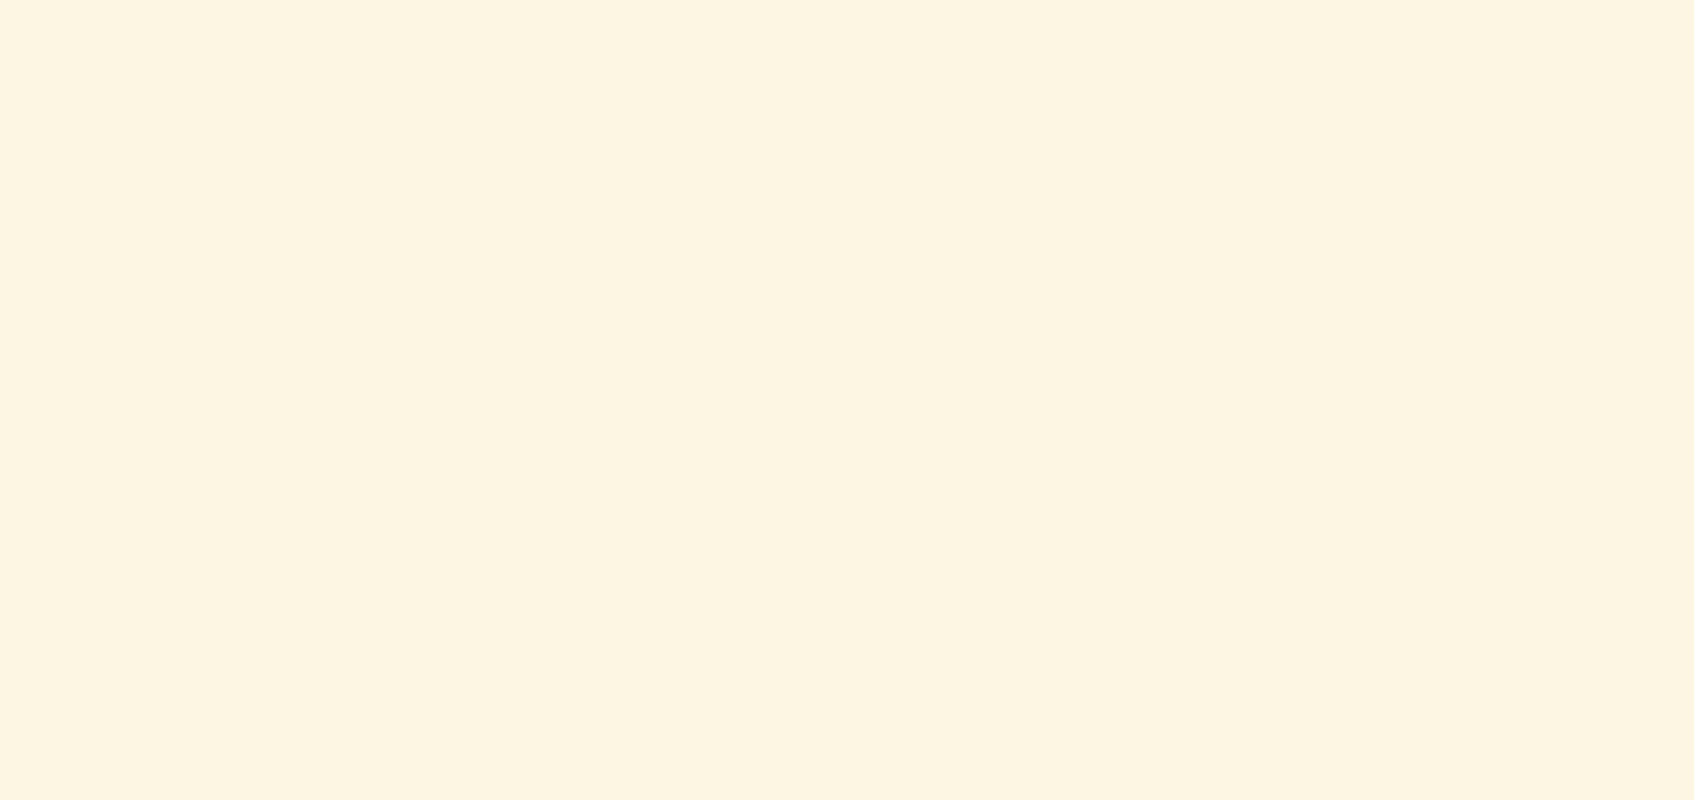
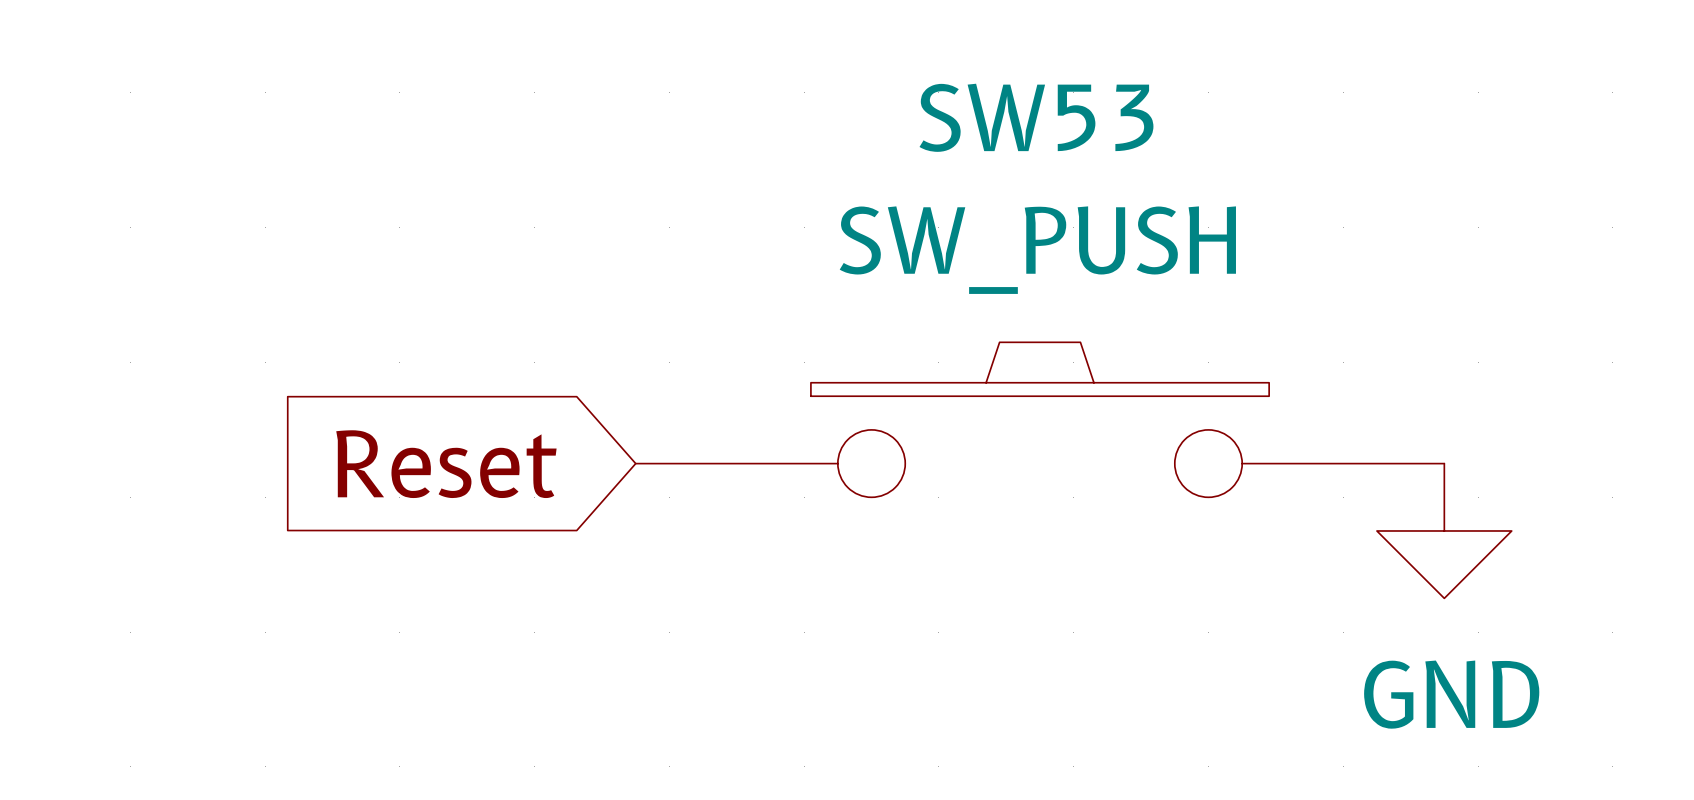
SW53: none -> SW_PUSH (1040, 419)
global label: none -> Reset (446, 464)
power symbol: none -> GND (1444, 530)

